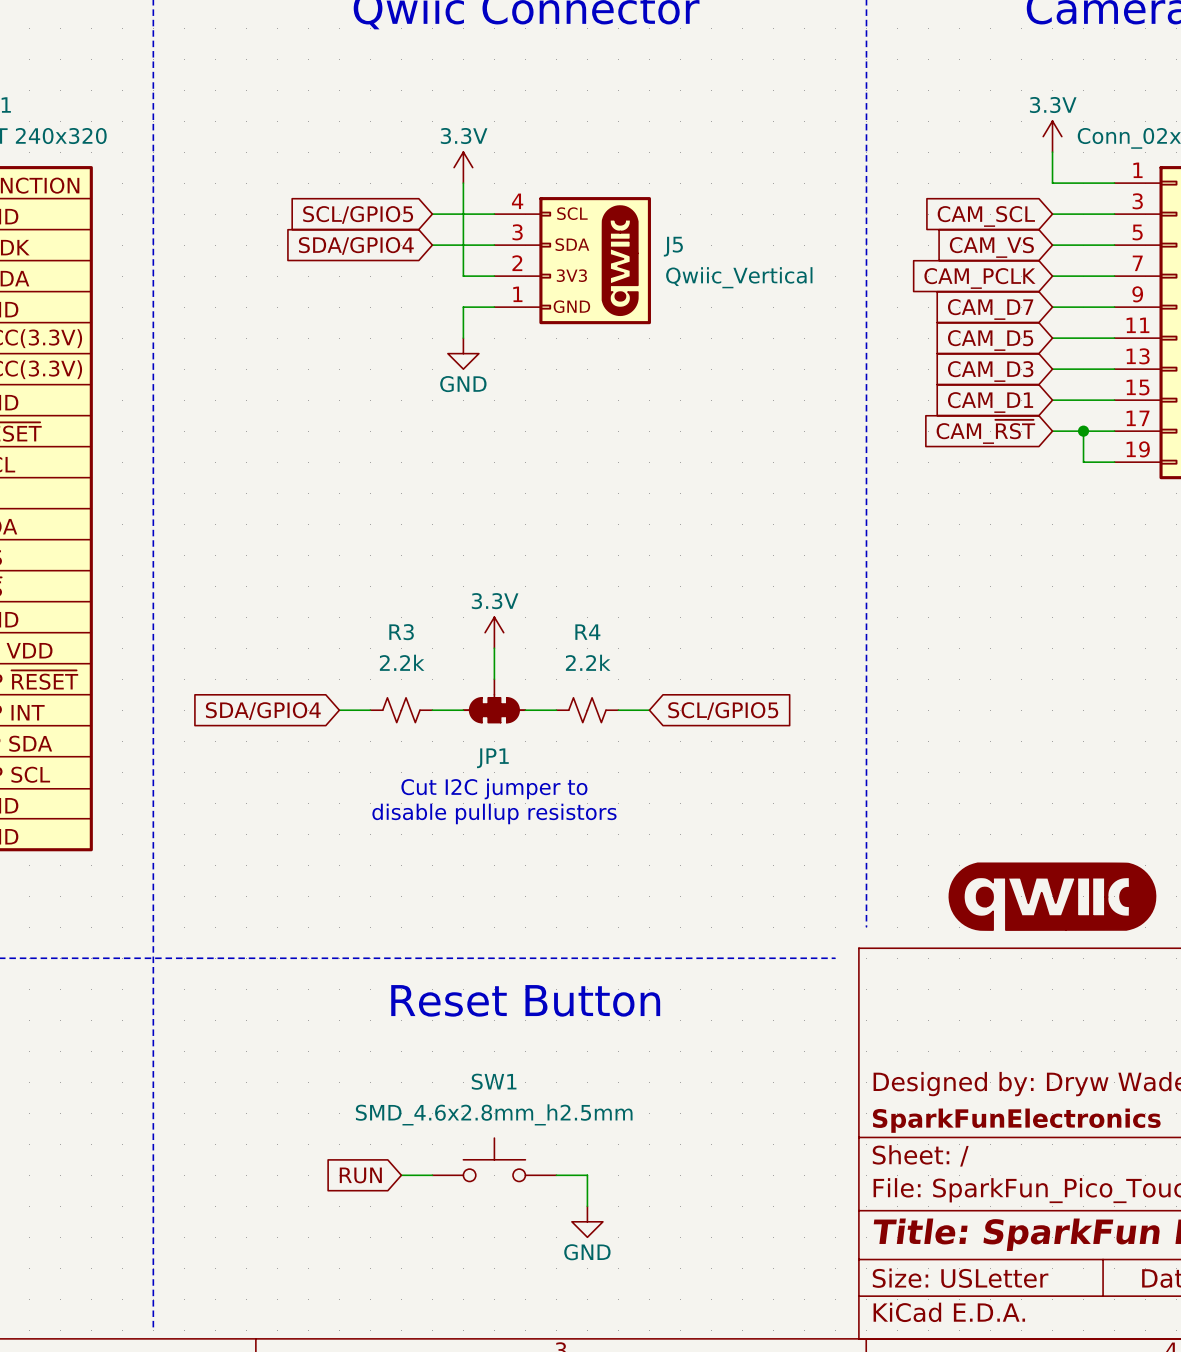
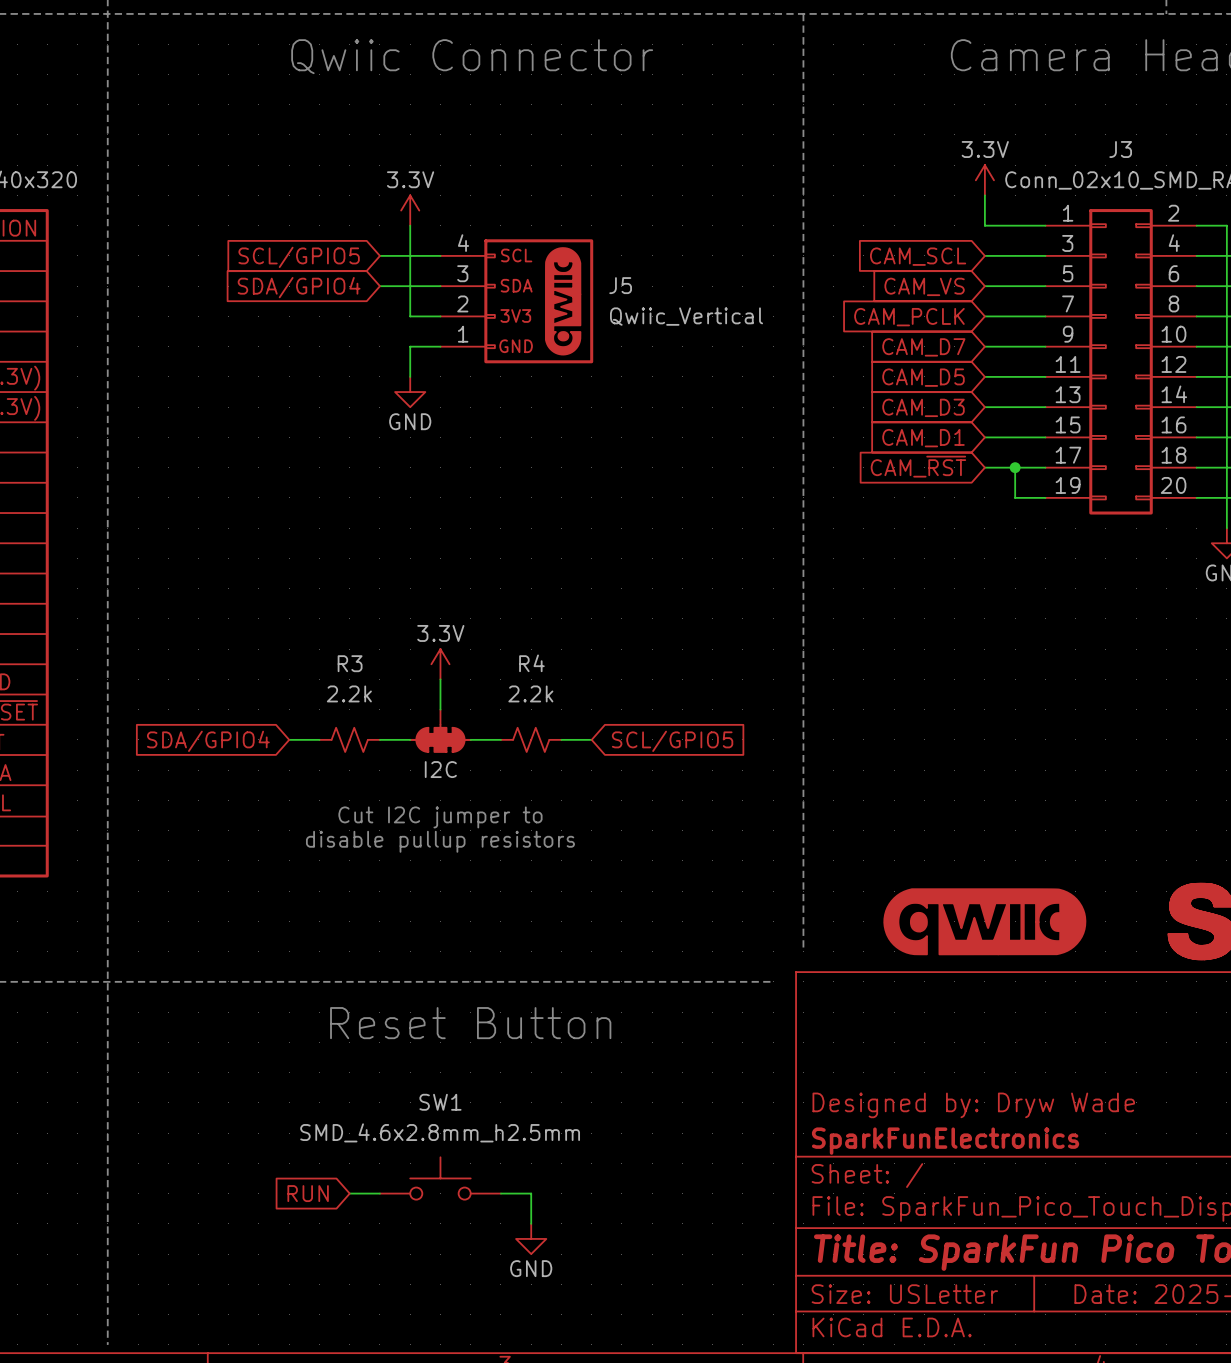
JP1 value: none -> I2C (440, 769)
JP1 name: JP1 (492, 758) -> none

